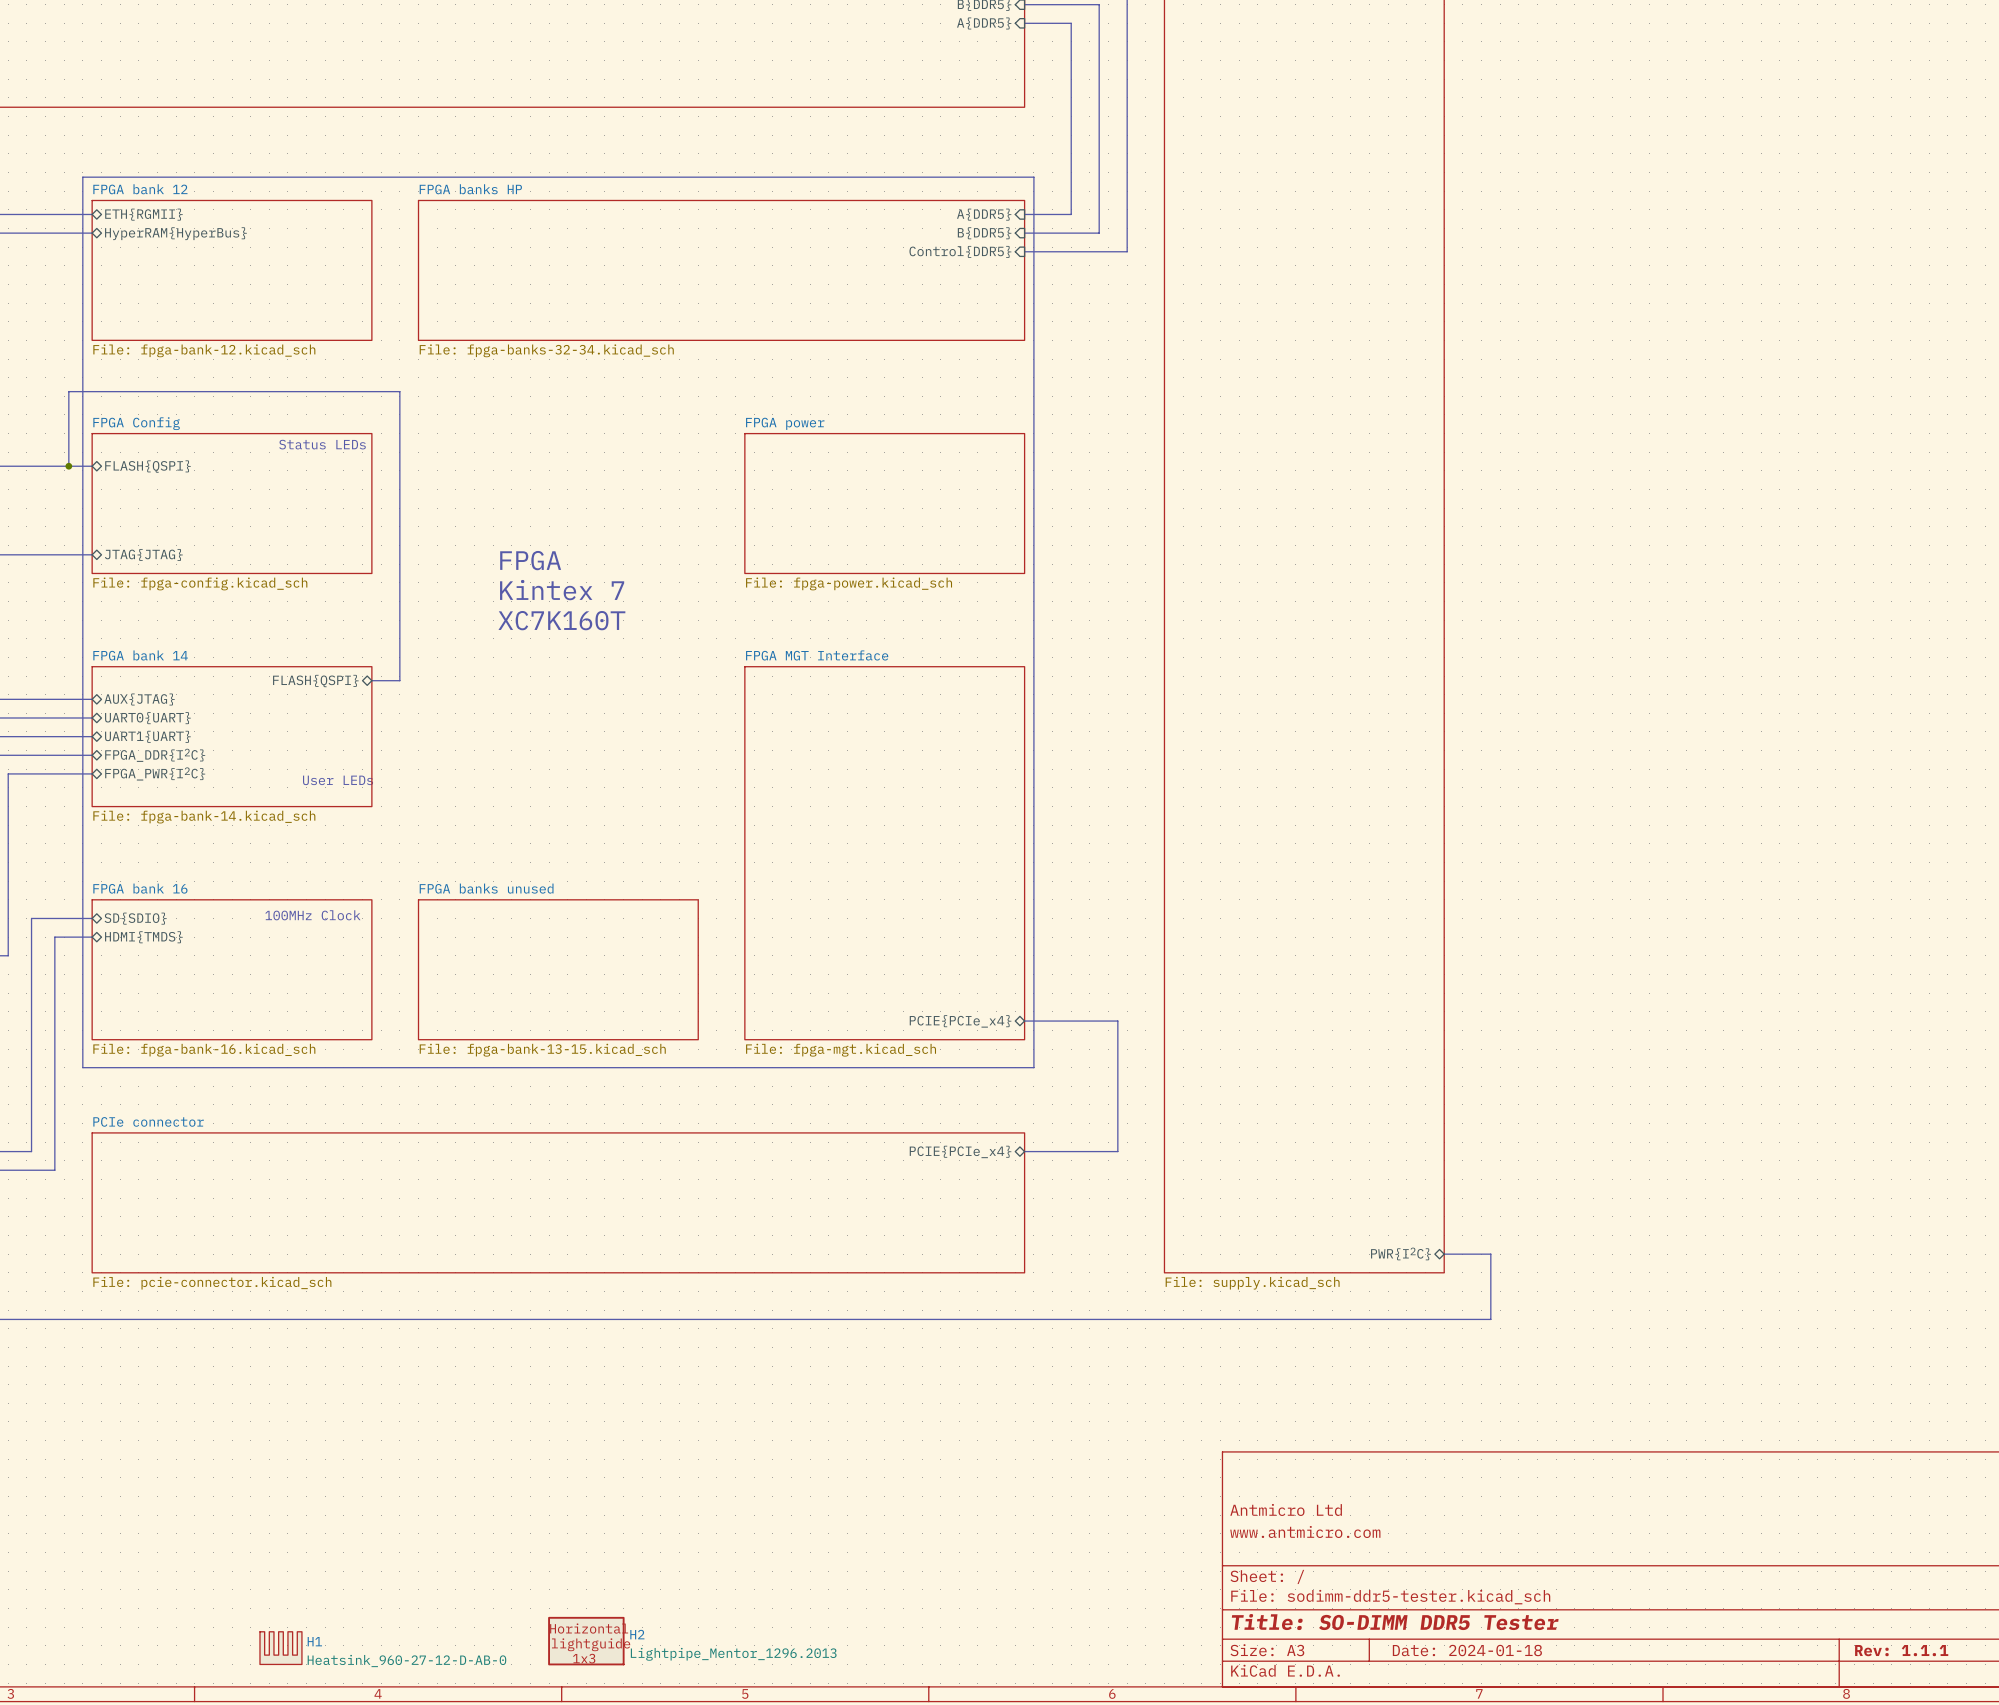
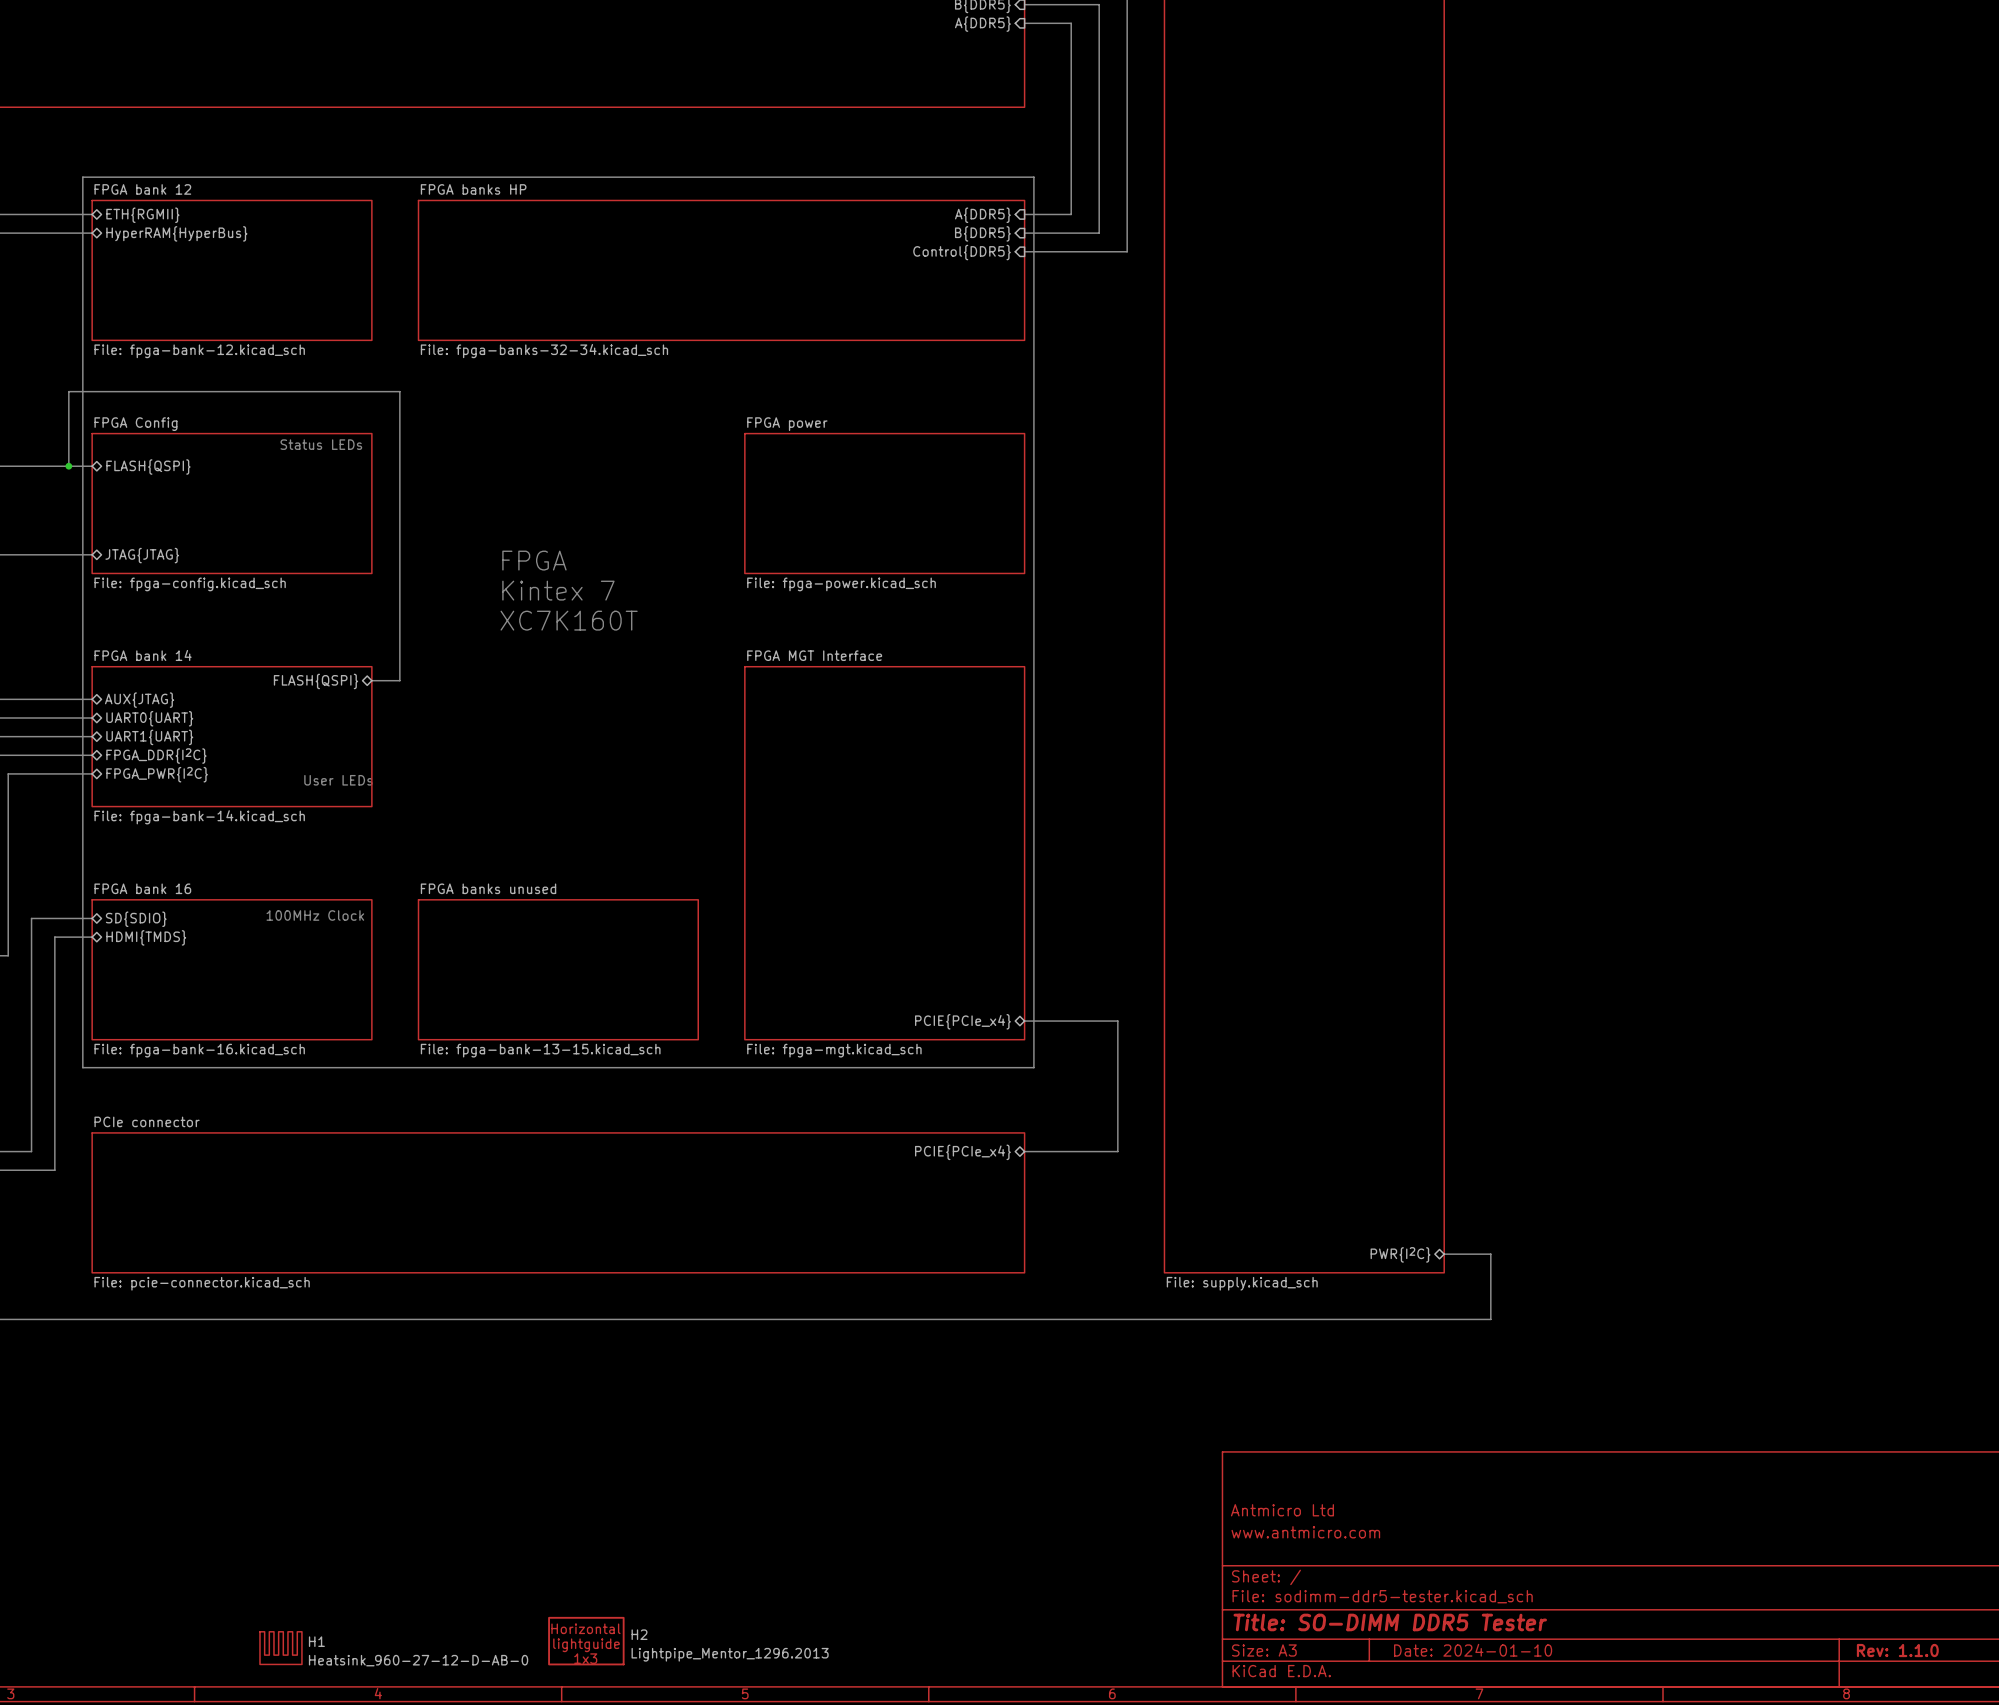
title block: Date: 2024-01-18 (1467, 1650) -> Date: 2024-01-10 (1473, 1650)
title block: Rev: 1.1.1 (1901, 1650) -> Rev: 1.1.0 (1897, 1650)

